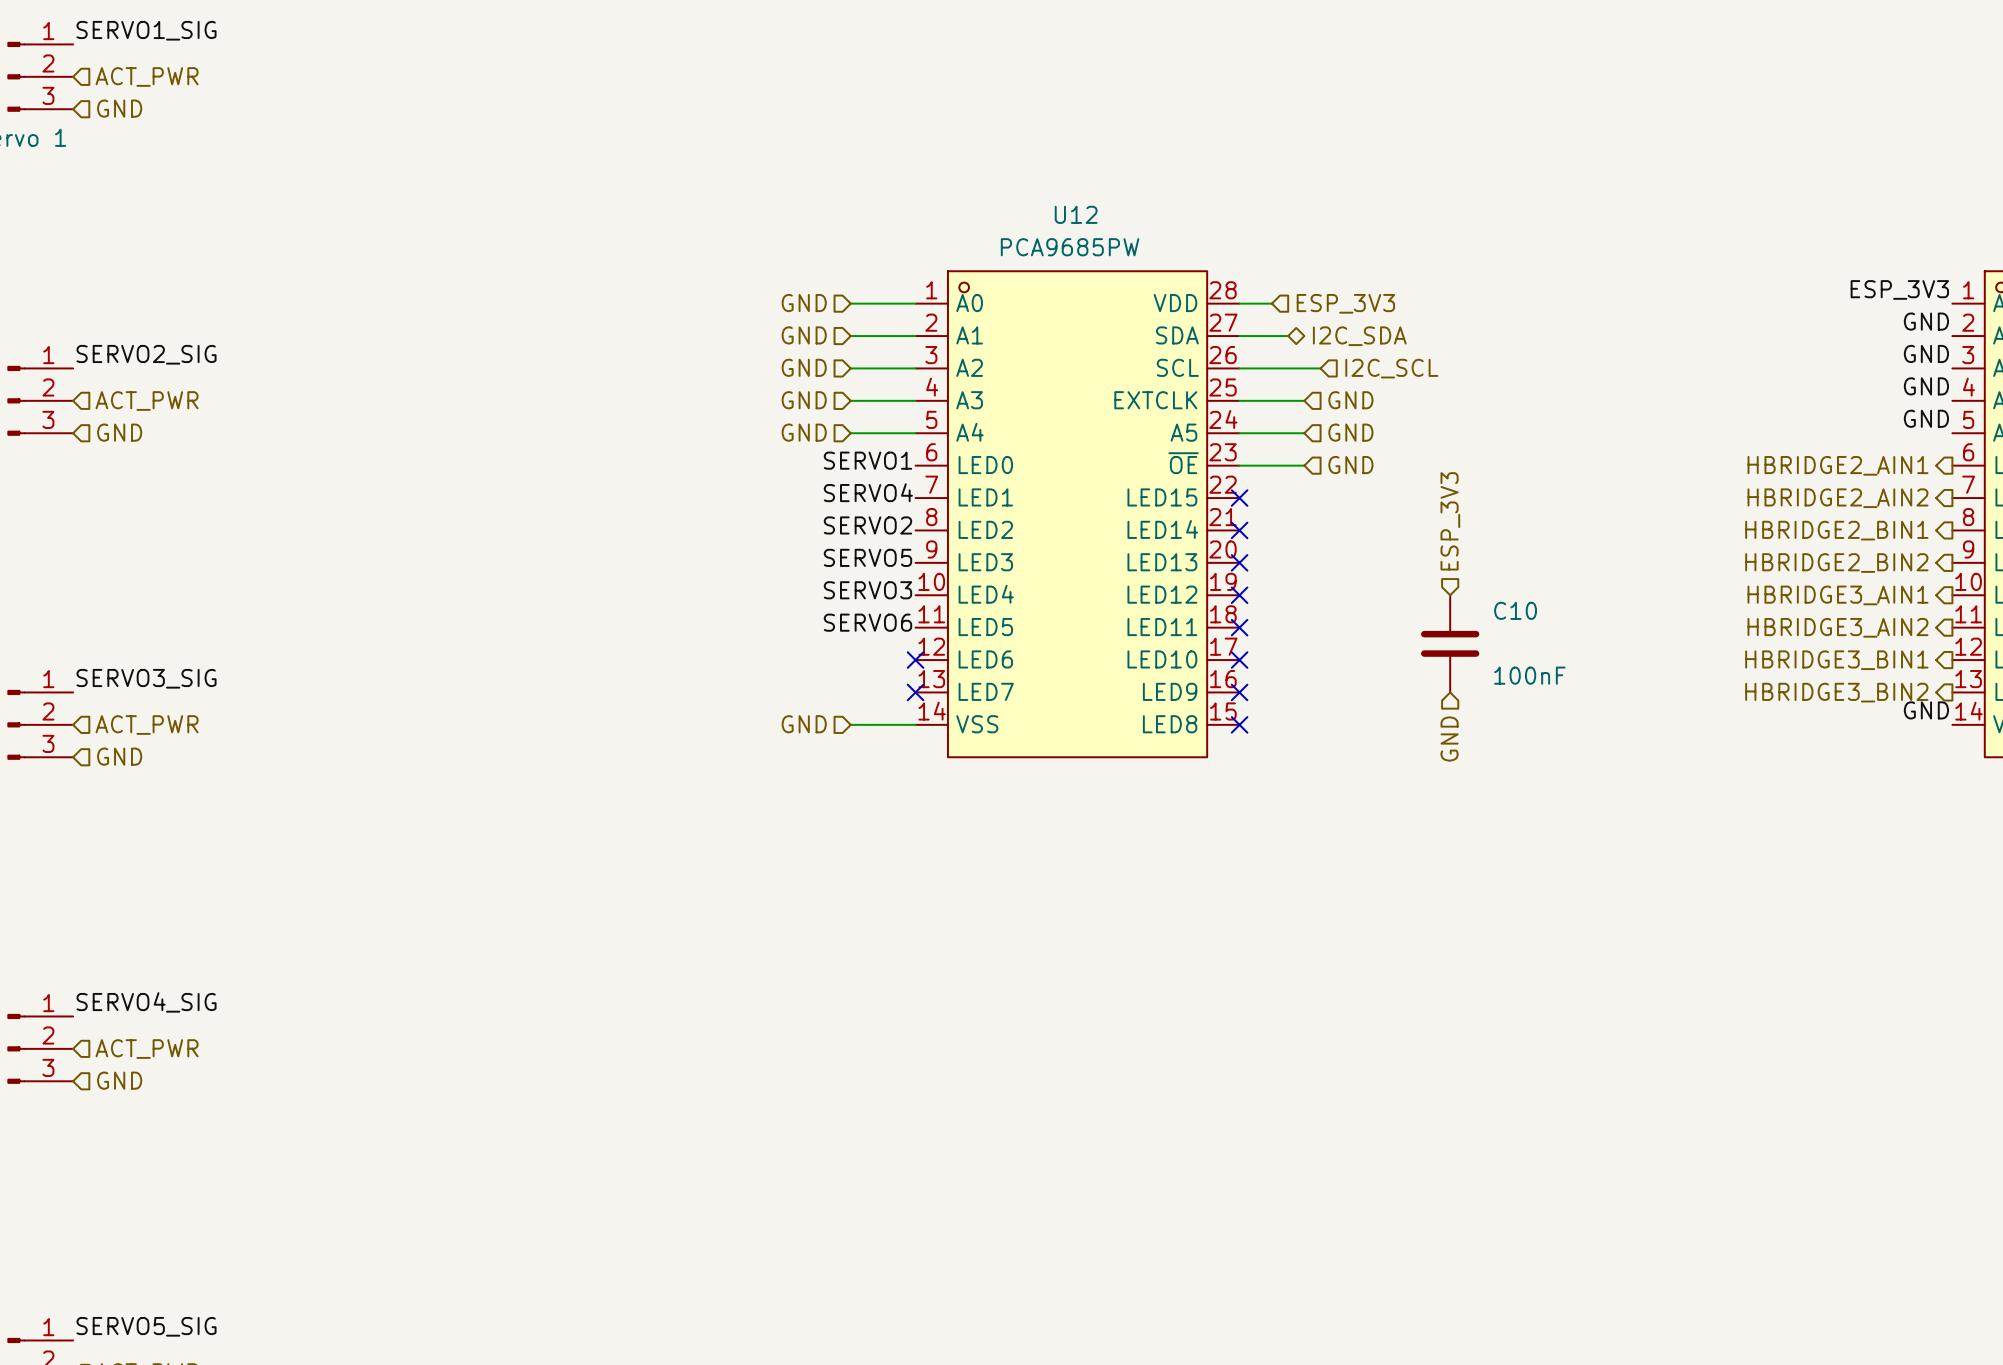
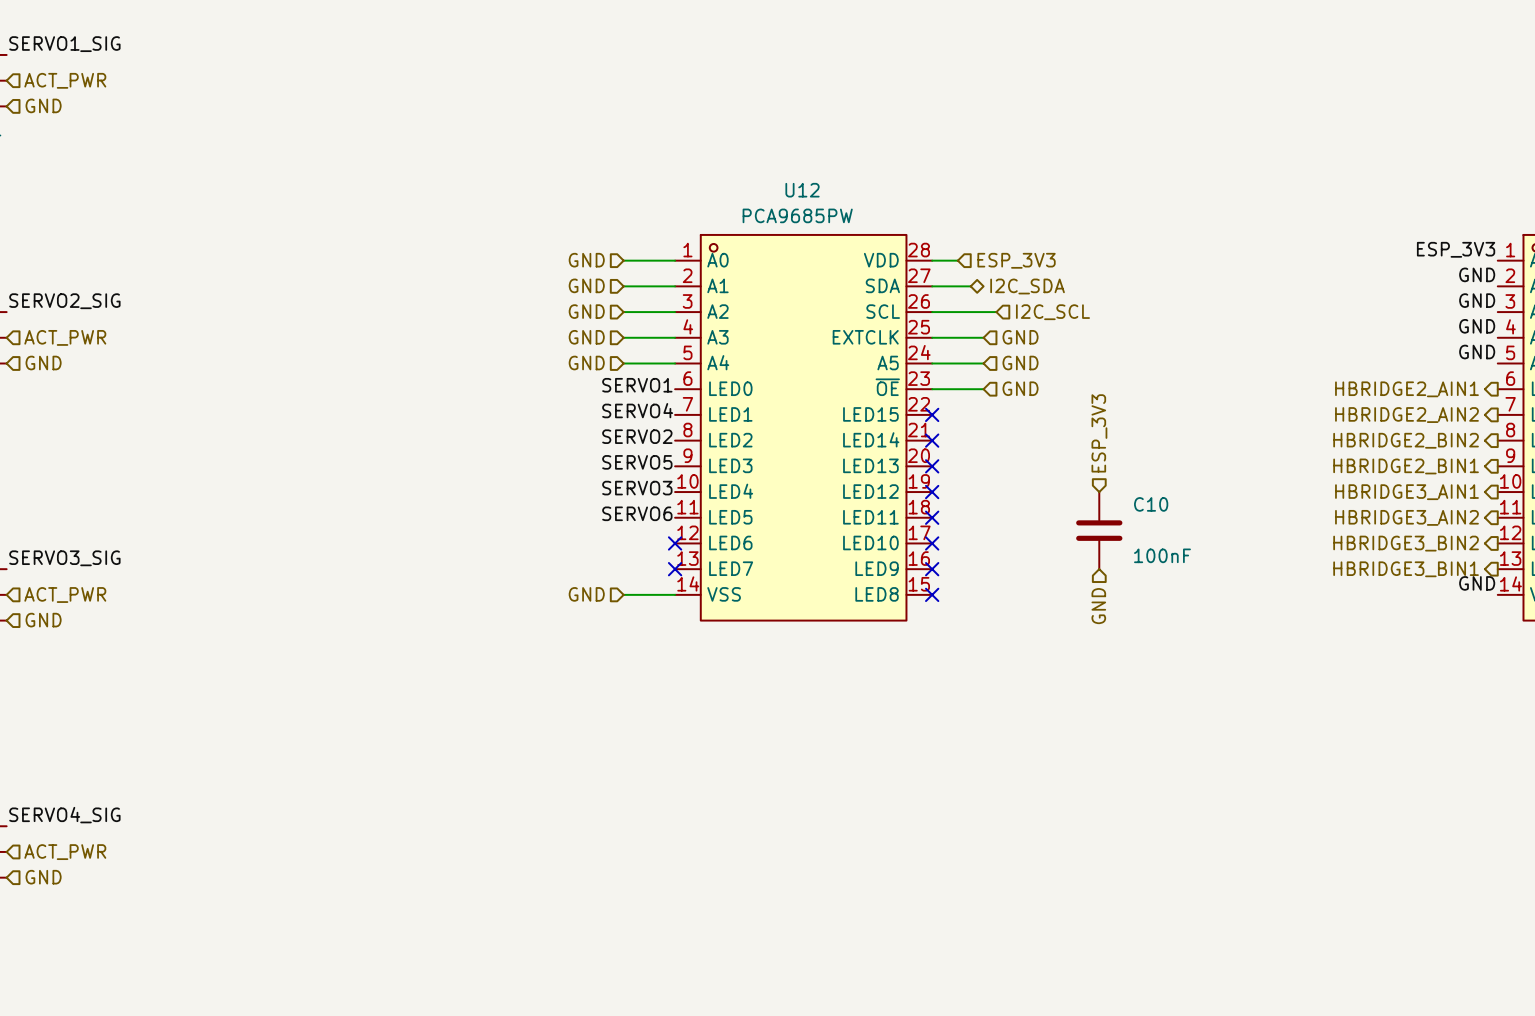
hierarchical label: HBRIDGE2_BIN1 (1836, 530) -> HBRIDGE2_BIN2 (1406, 440)
hierarchical label: HBRIDGE2_BIN2 (1836, 563) -> HBRIDGE2_BIN1 (1406, 466)
hierarchical label: HBRIDGE3_BIN1 (1836, 660) -> HBRIDGE3_BIN2 (1406, 543)
hierarchical label: HBRIDGE3_BIN2 (1836, 692) -> HBRIDGE3_BIN1 (1406, 569)

